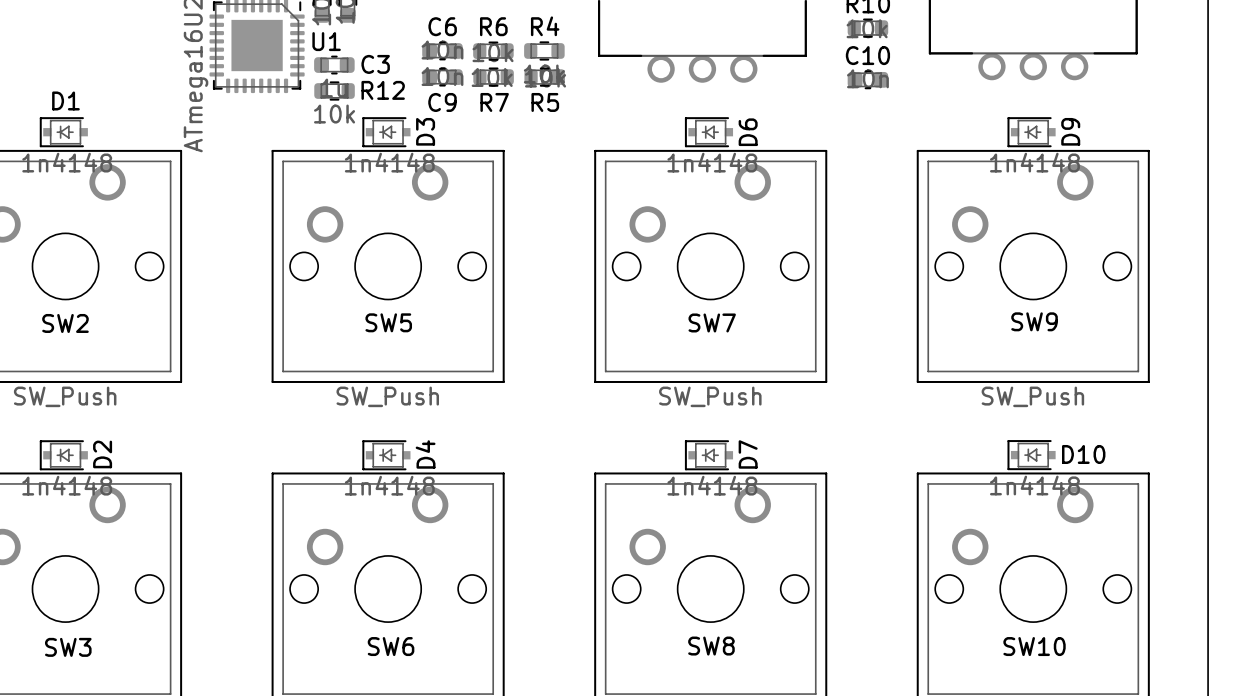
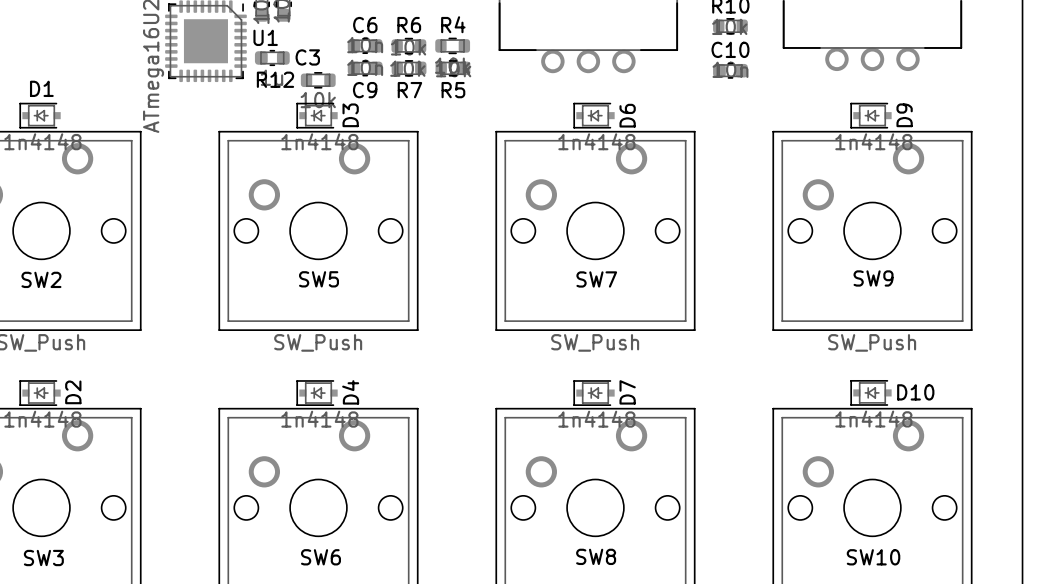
R12 name position: R12 (383, 90) -> R12 (275, 79)
R12 position: (334, 91) -> (318, 80)

